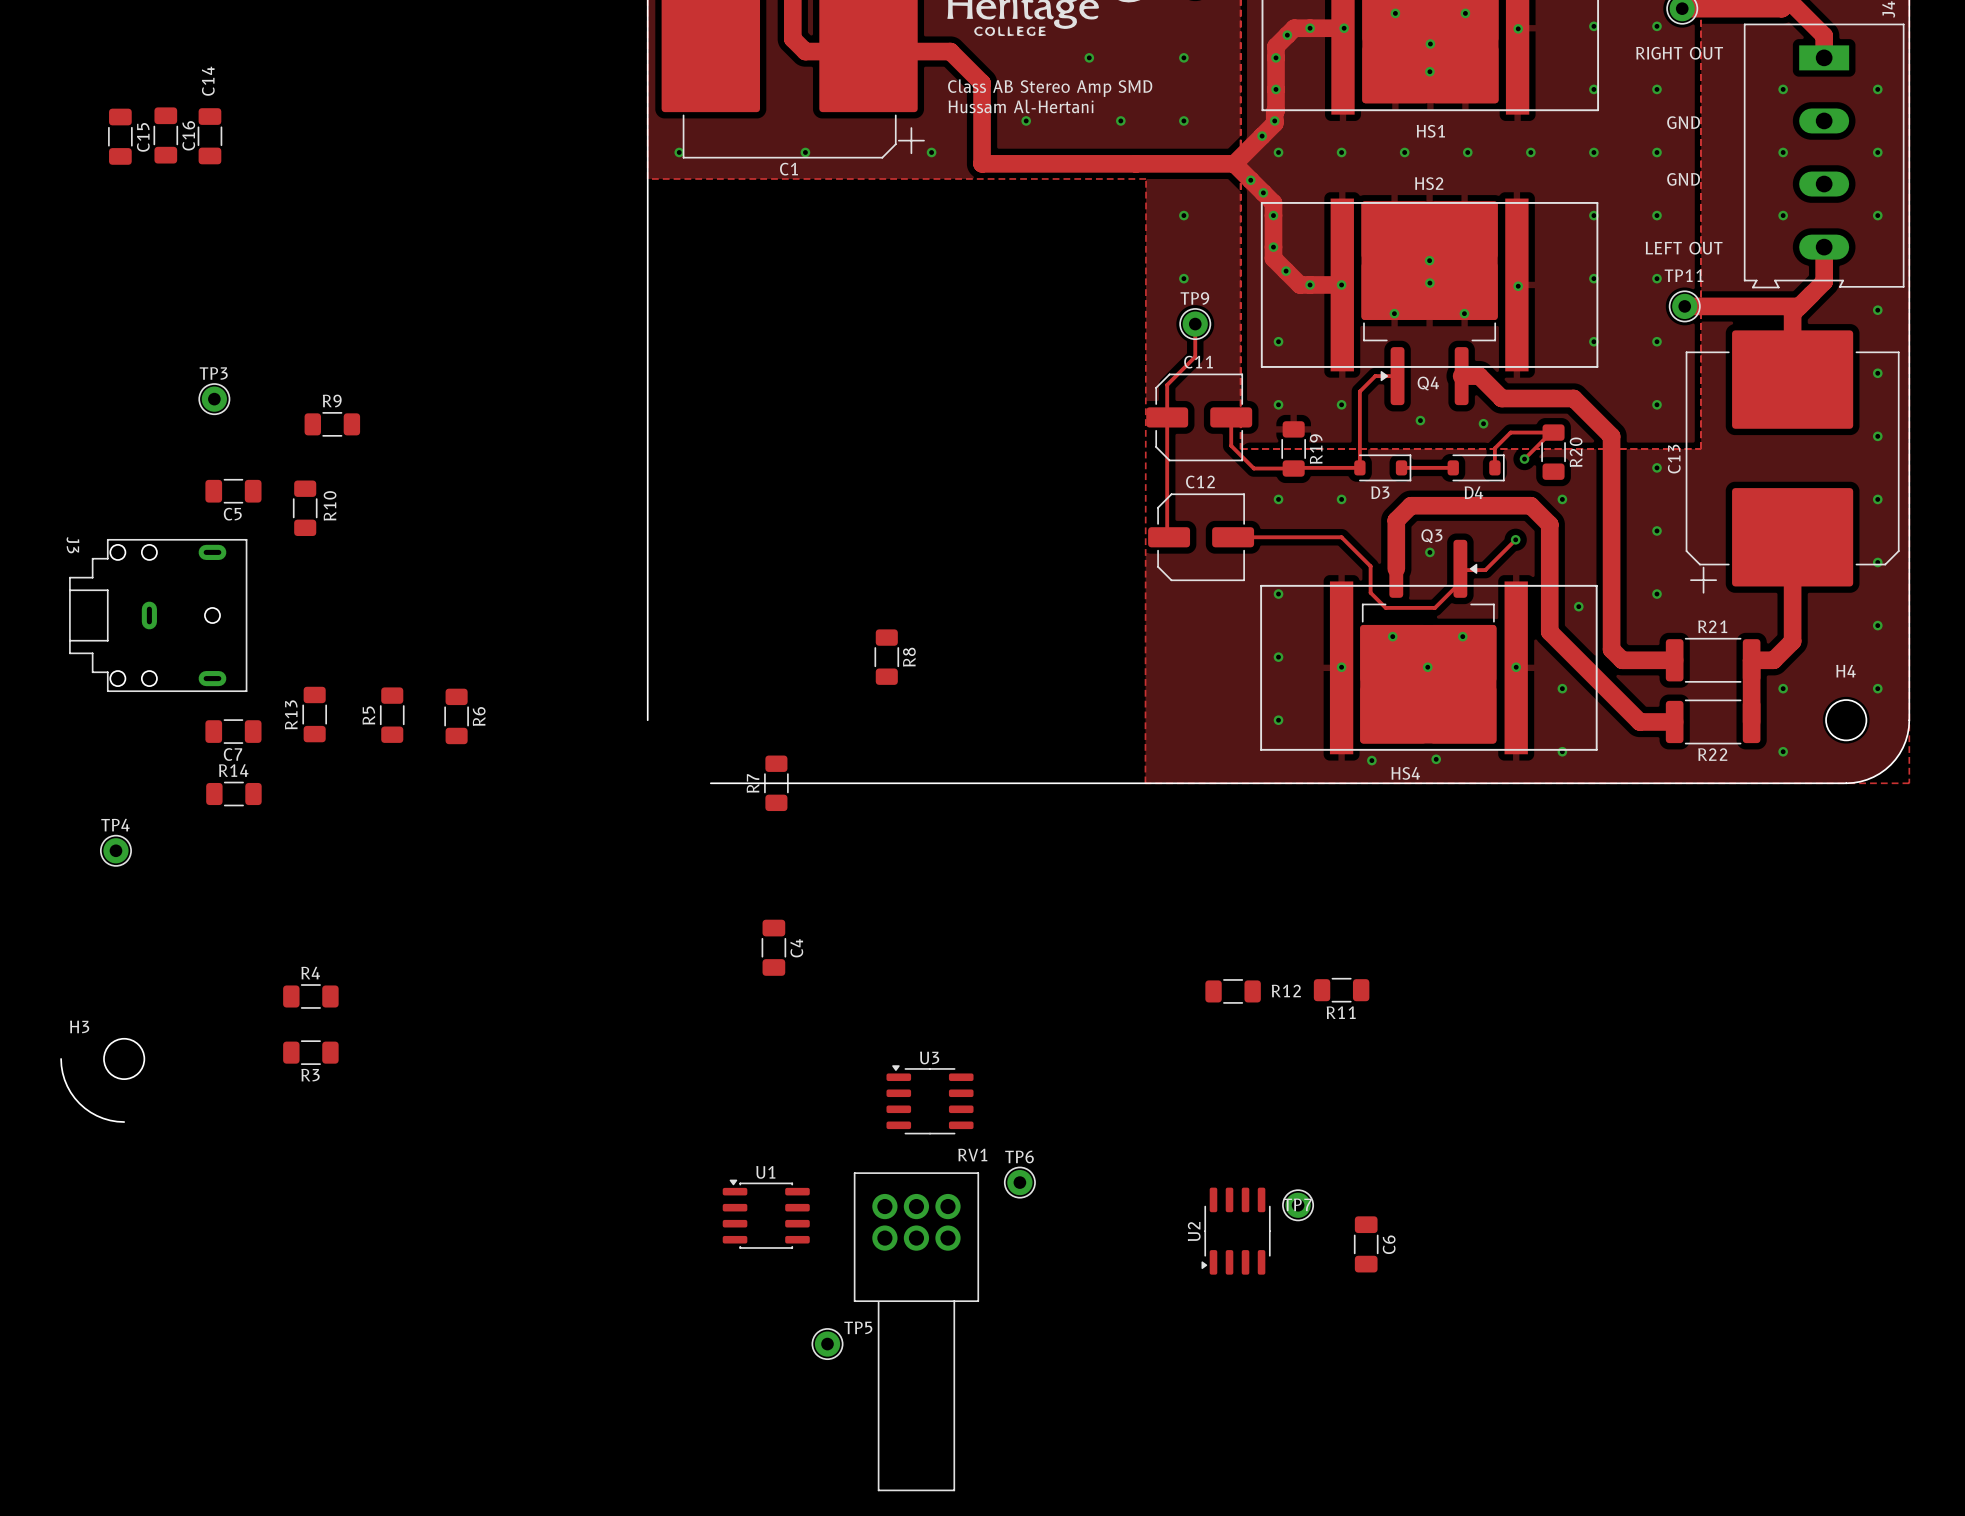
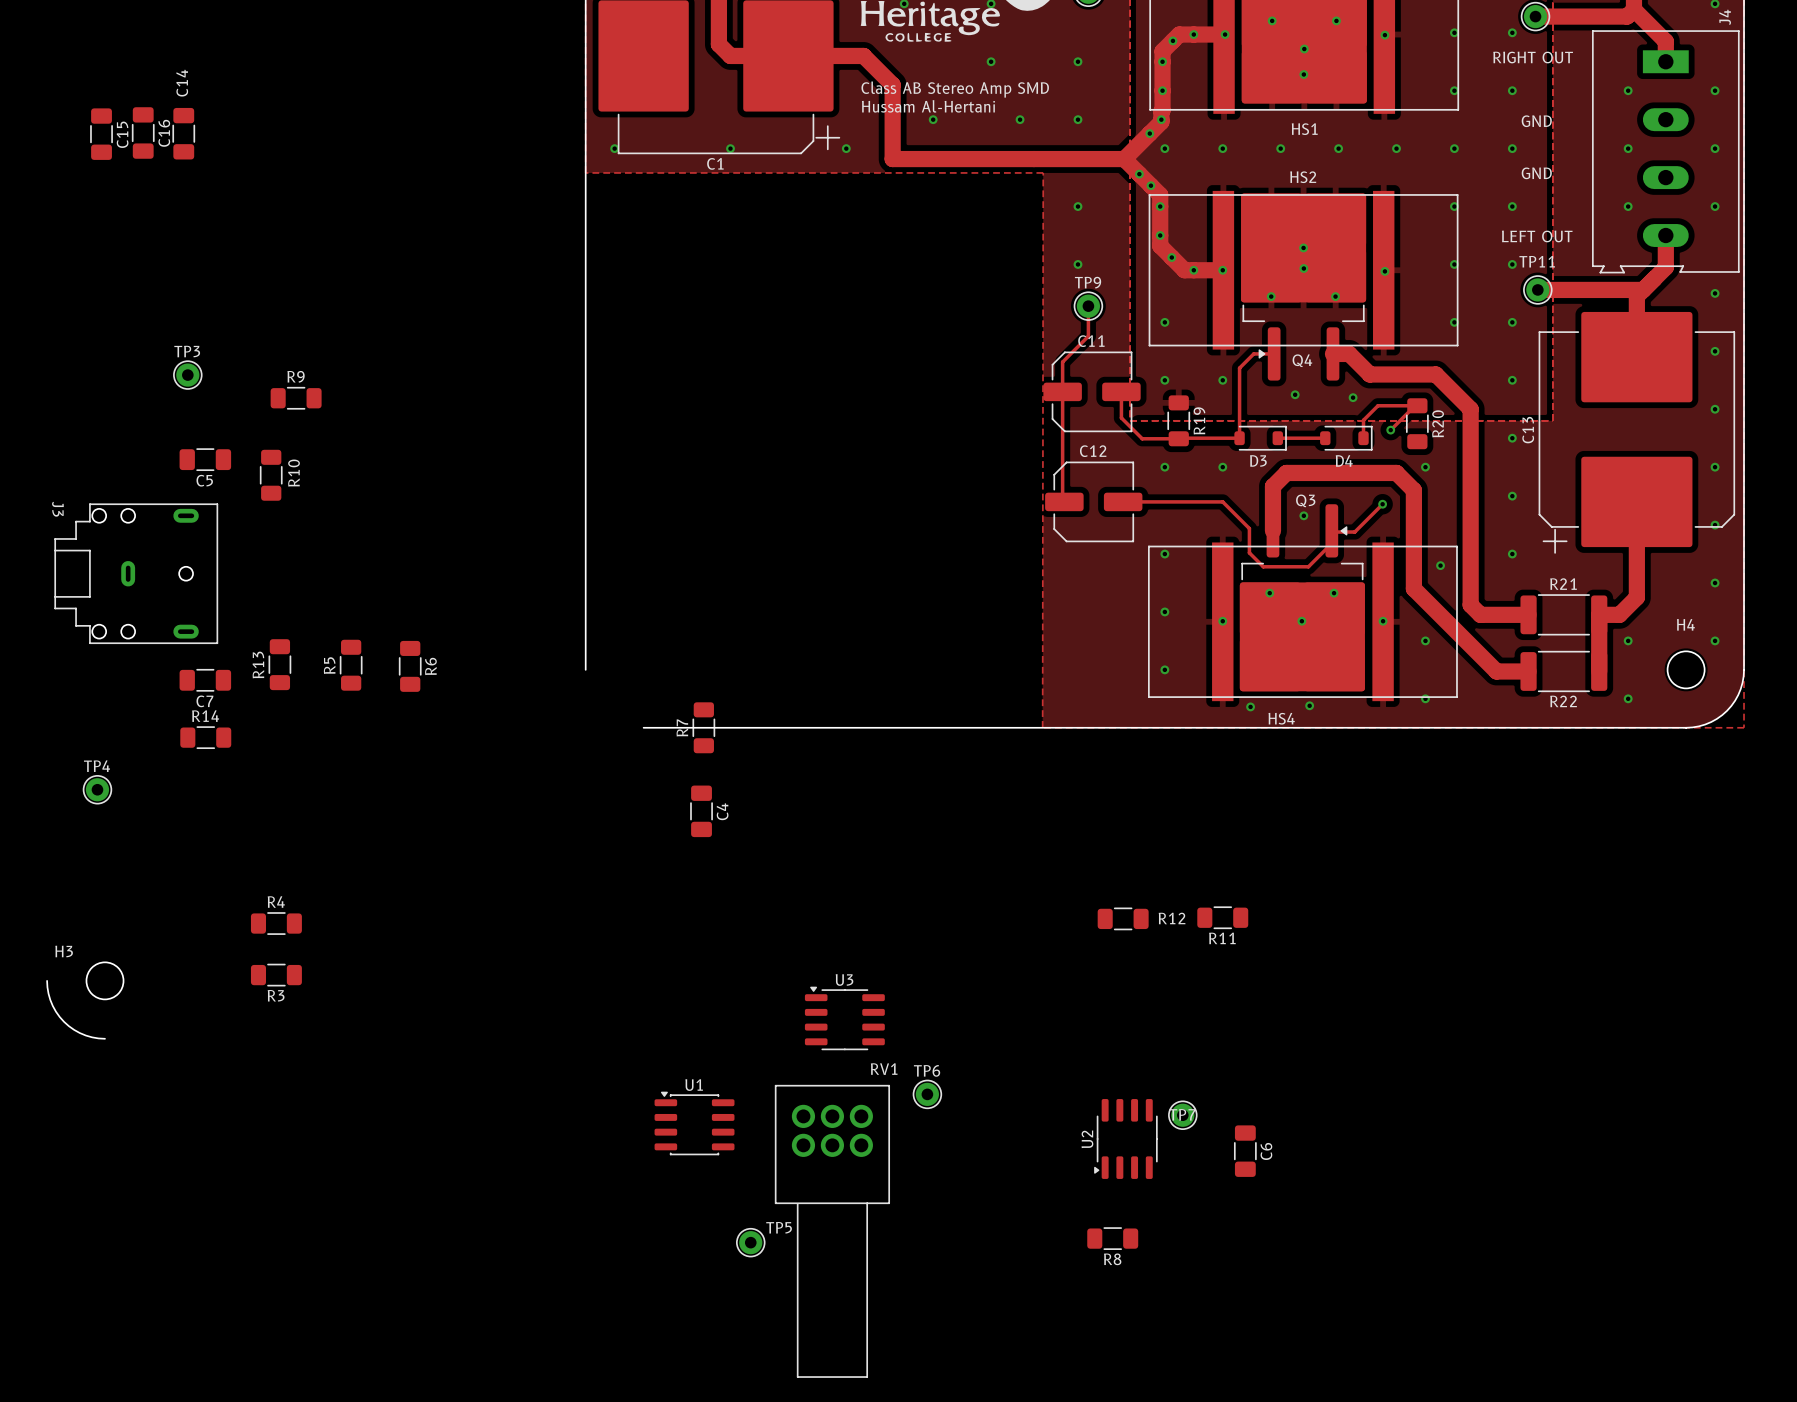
R8 rotation: 0° (886, 657) -> 90° clockwise (1112, 1238)
R8 position: (886, 657) -> (1112, 1238)
C4 position: (773, 947) -> (701, 811)

